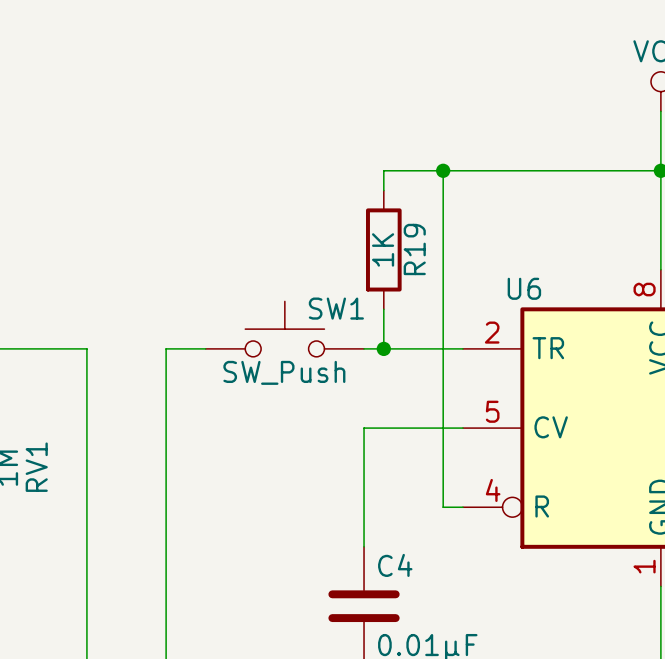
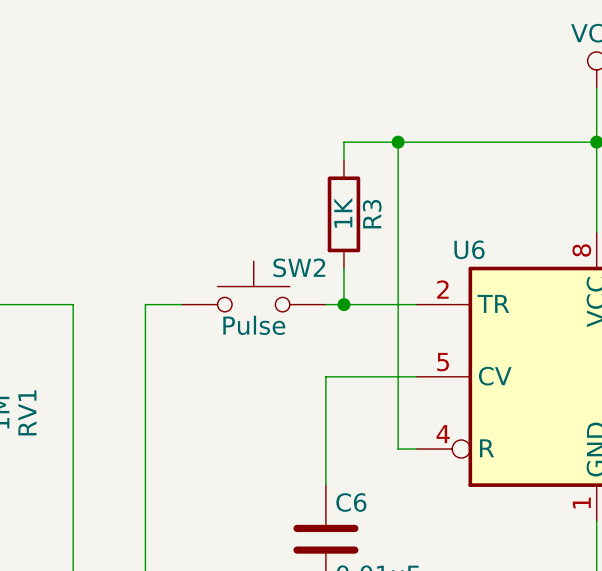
R19 name: R19 (414, 249) -> R3 (372, 214)
SW1 name: SW1 (336, 308) -> SW2 (299, 267)
SW1 value: SW_Push (284, 372) -> Pulse (254, 325)
C4 name: C4 (395, 565) -> C6 (351, 502)

